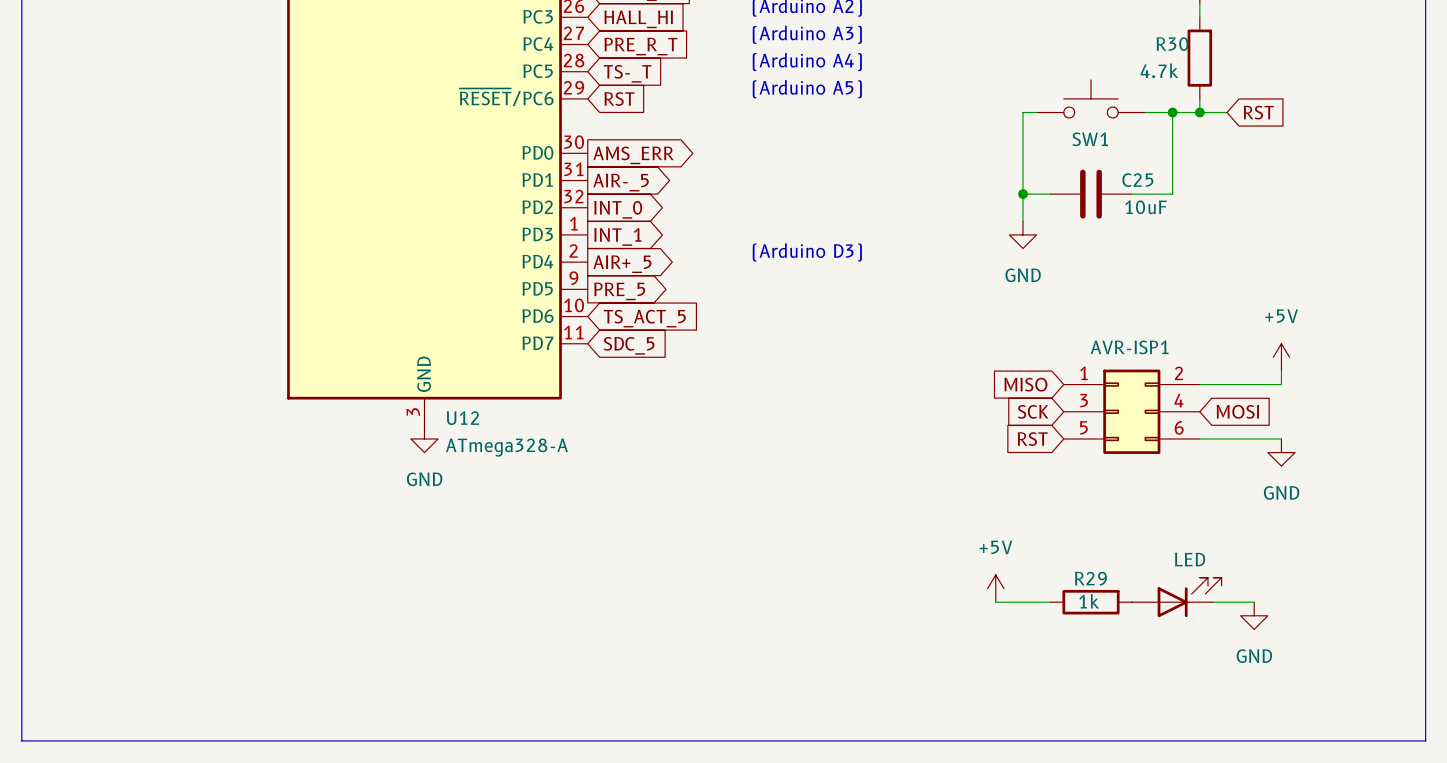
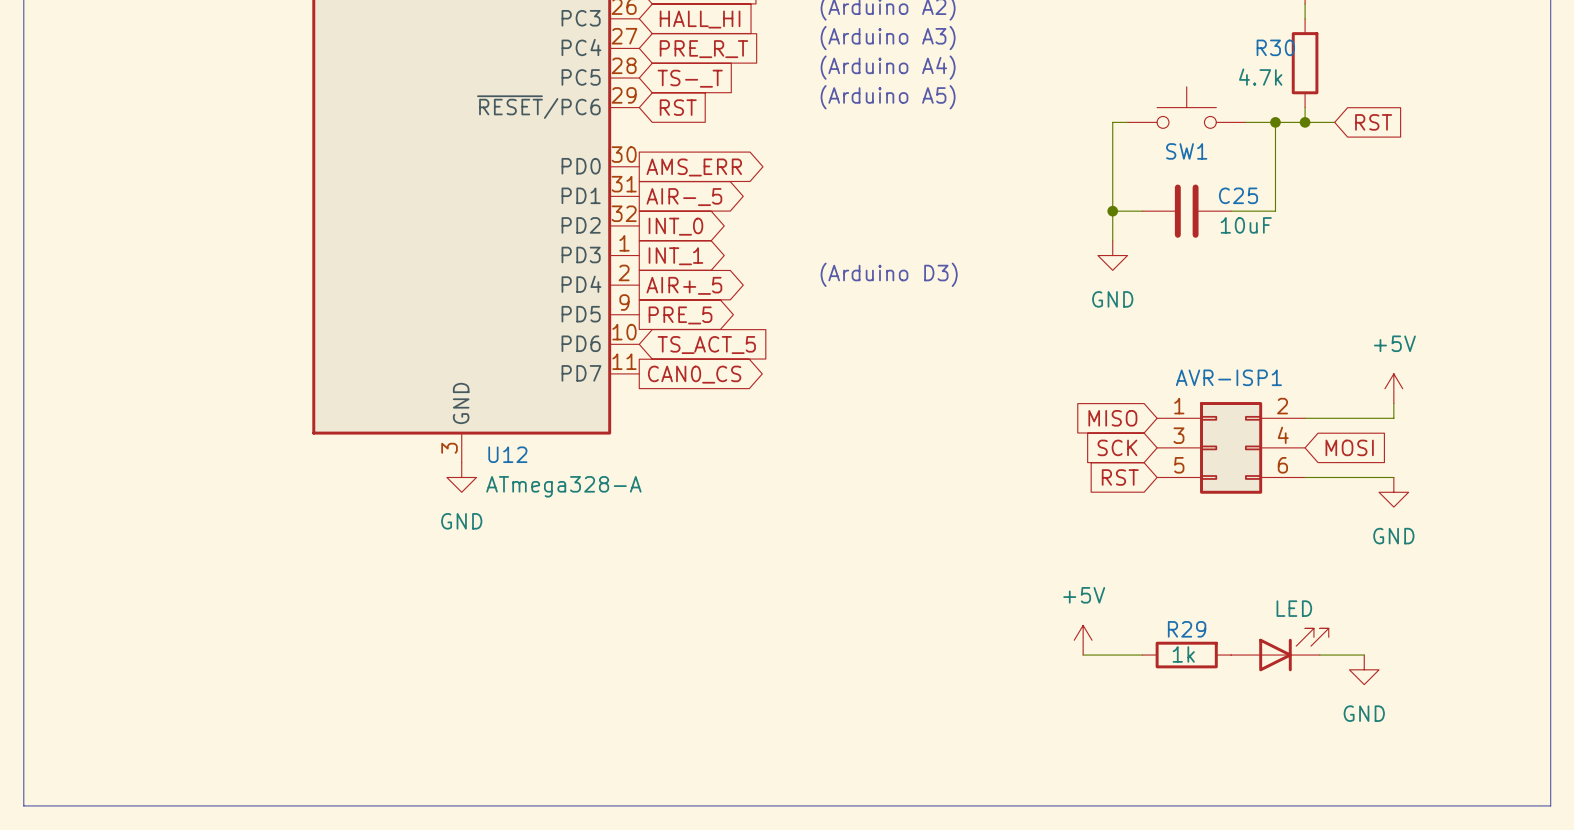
global label shape: input (629, 345) -> output (694, 374)
global label: SDC_5 (629, 345) -> CAN0_CS (694, 374)

